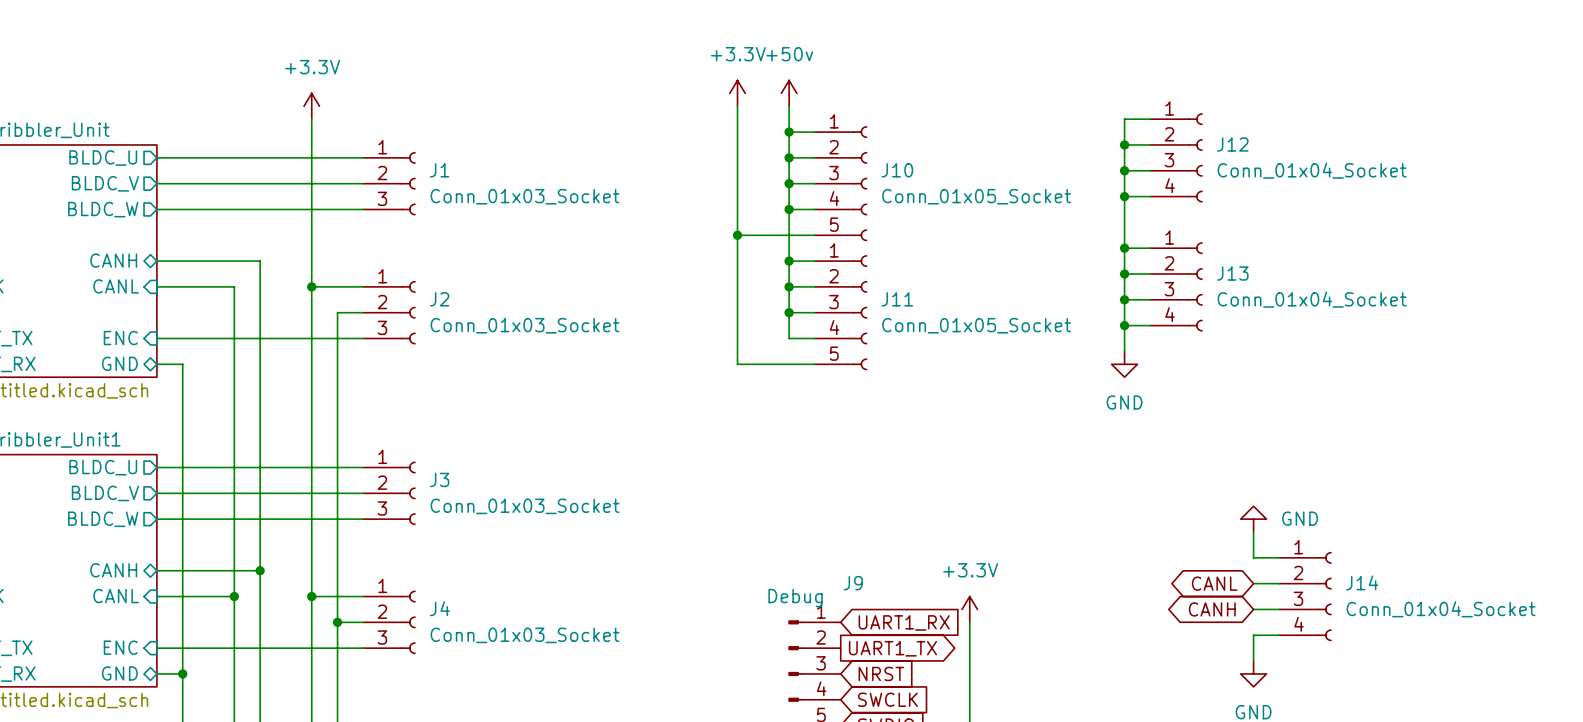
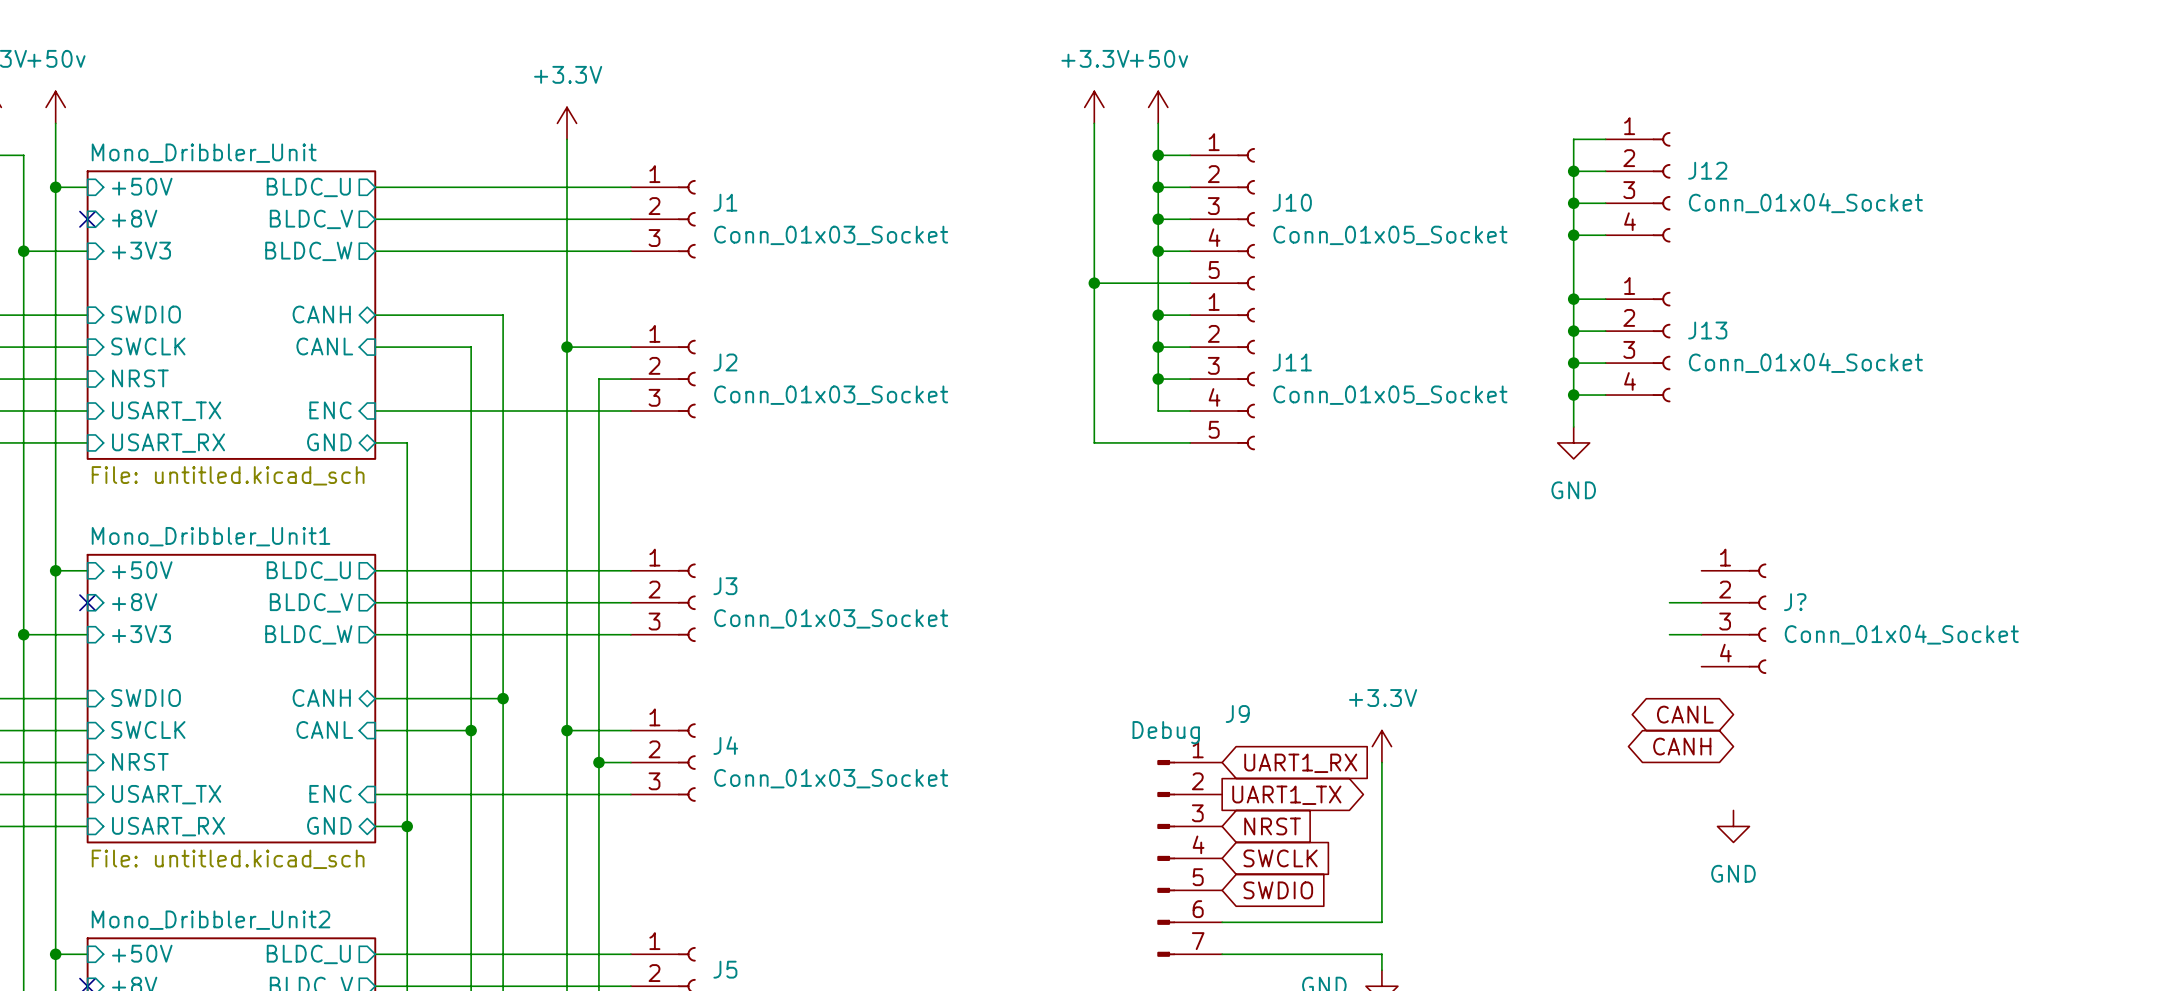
J?: none -> Conn_01x04_Socket (1733, 618)
power symbol: GND (1253, 519) -> none
wire: (1253, 532) (1253, 557) (1279, 557) -> none
wire: (1253, 583) (1279, 583) -> (1669, 602) (1701, 602)
J14: Conn_01x04_Socket (1305, 596) -> none
wire: (1253, 609) (1279, 609) -> (1669, 634) (1701, 634)
wire: (1279, 635) (1253, 635) (1253, 661) -> none

